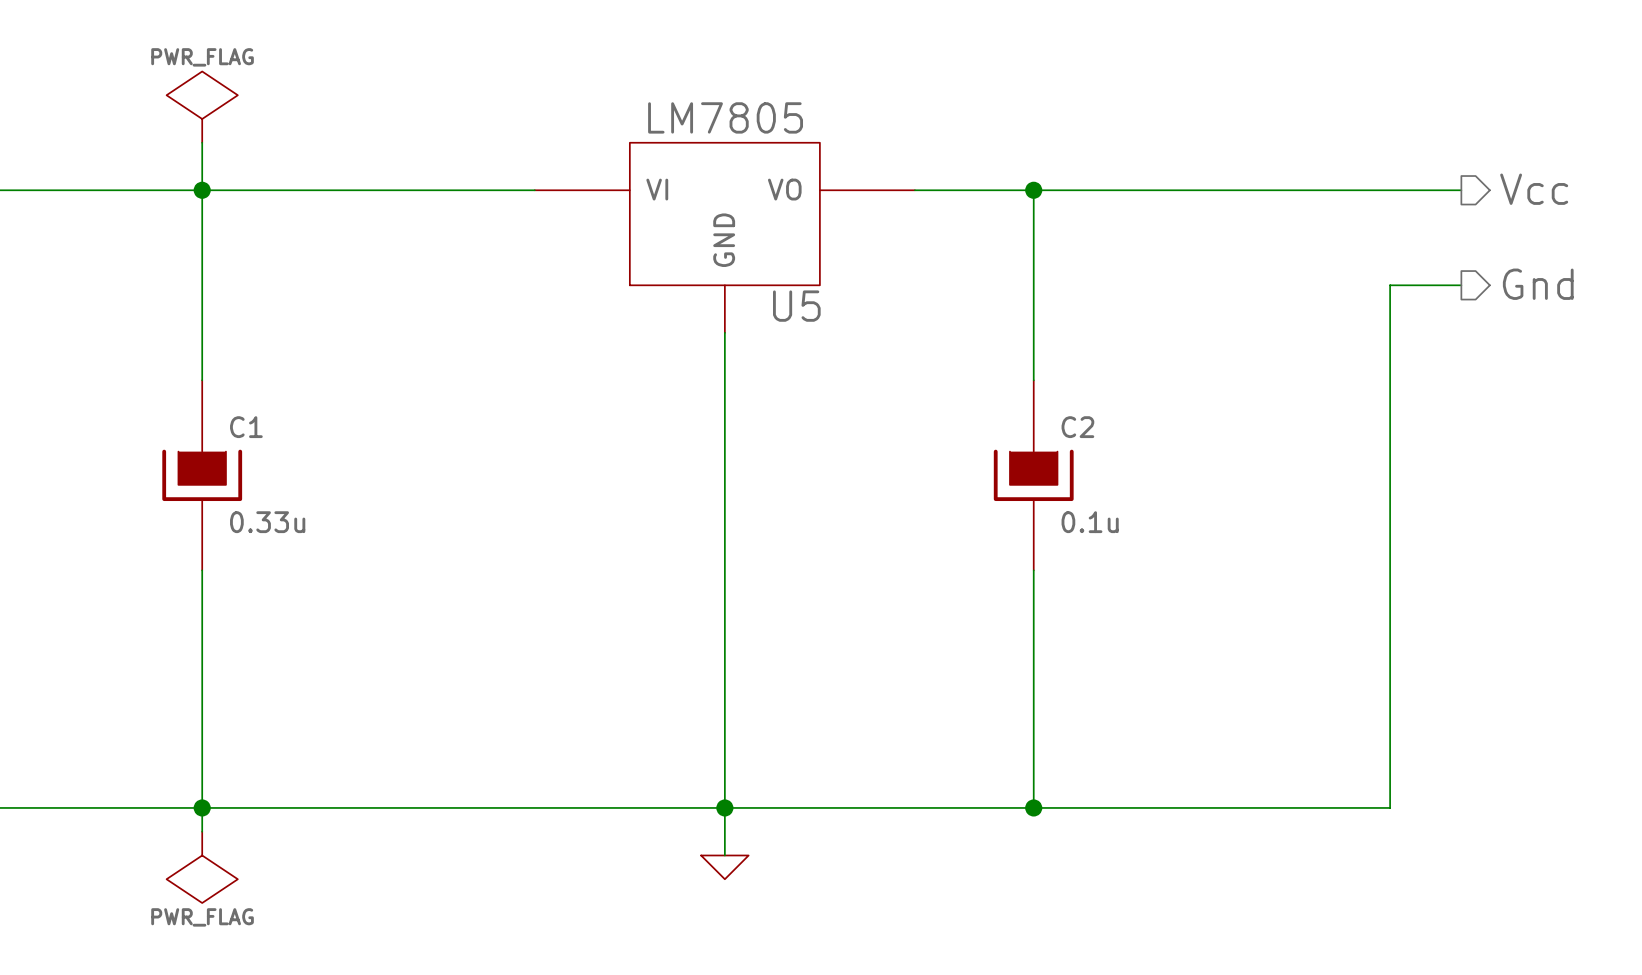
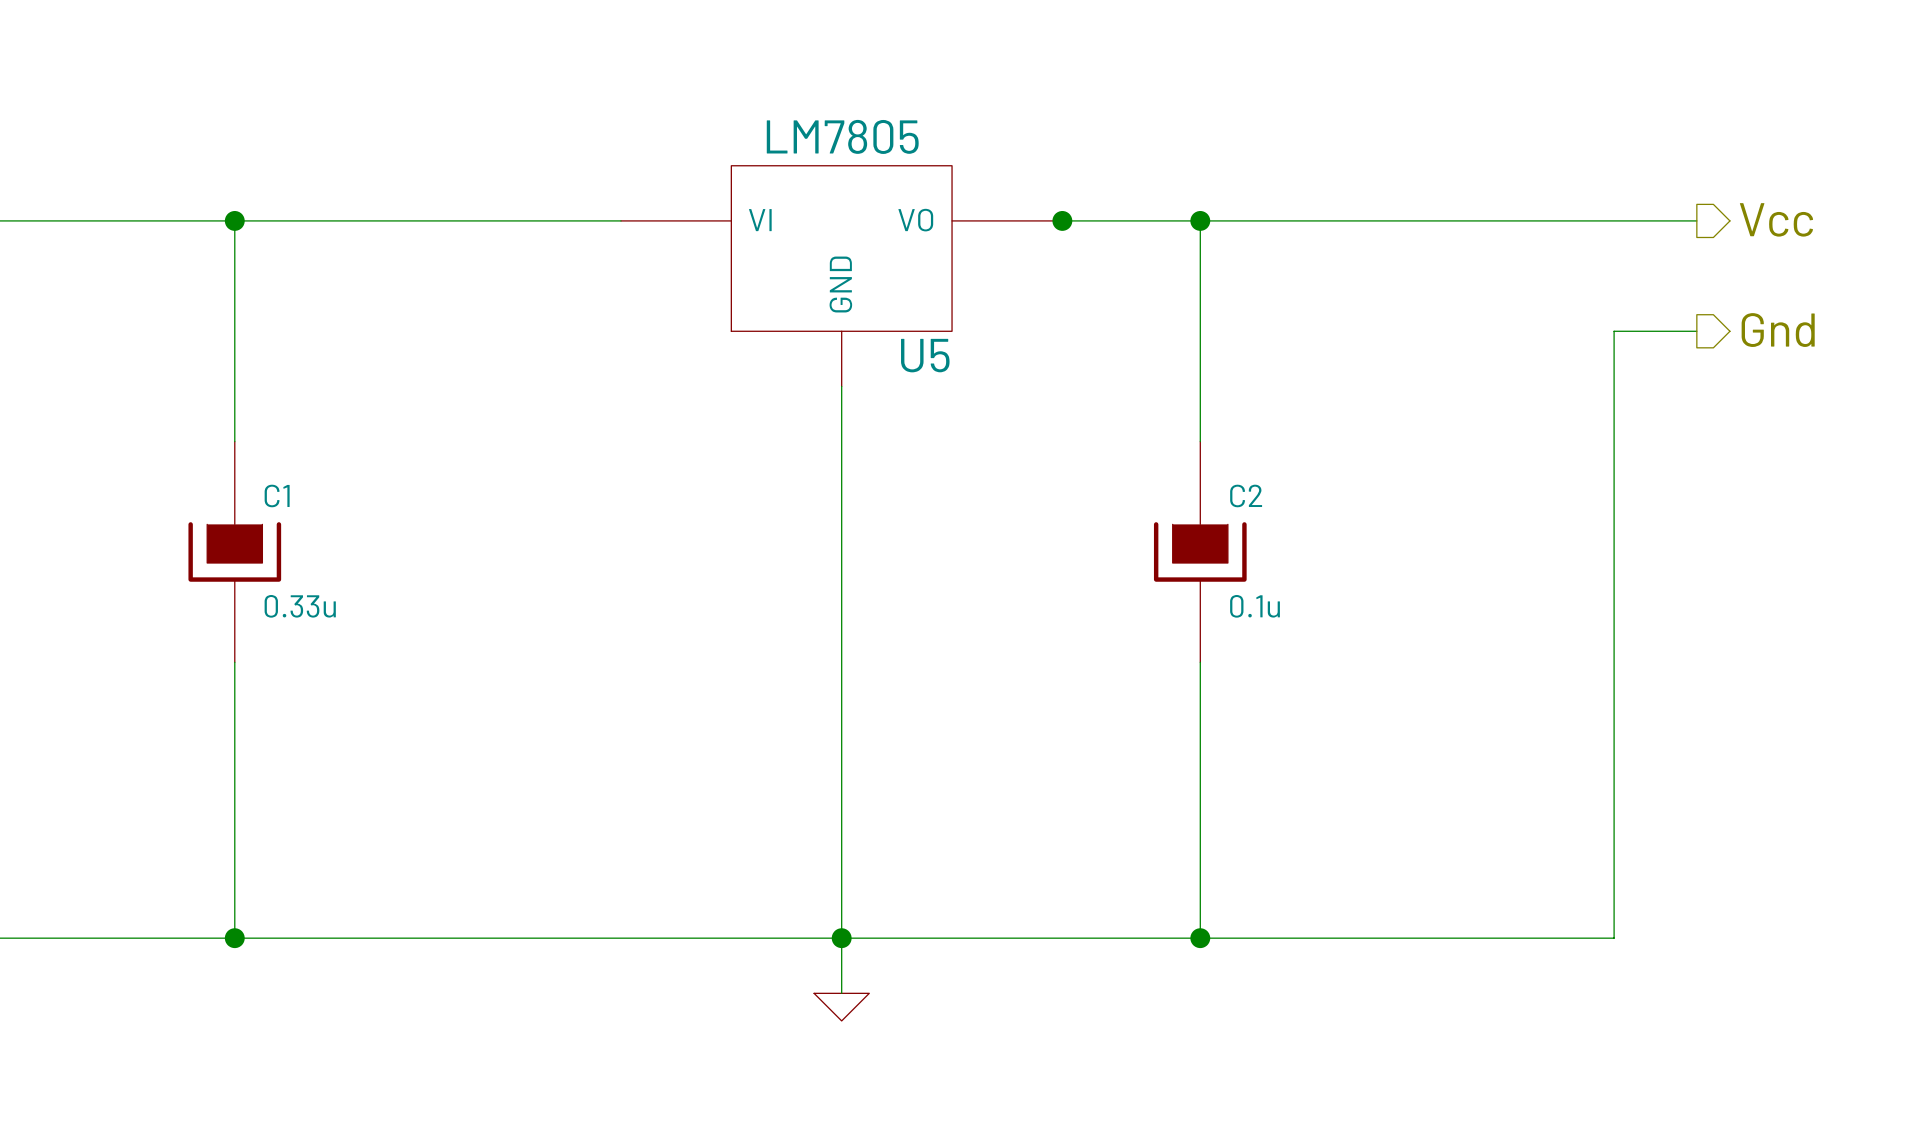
power symbol: PWR_FLAG (202, 107) -> none
wire: (202, 142) (202, 190) -> none
junction: none -> (1062, 220)
wire: (202, 807) (202, 831) -> none
power symbol: PWR_FLAG (202, 867) -> none

